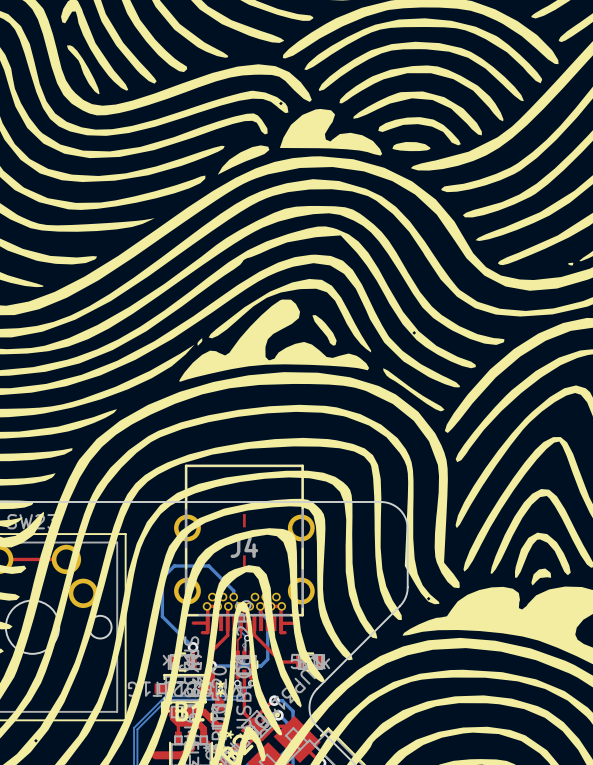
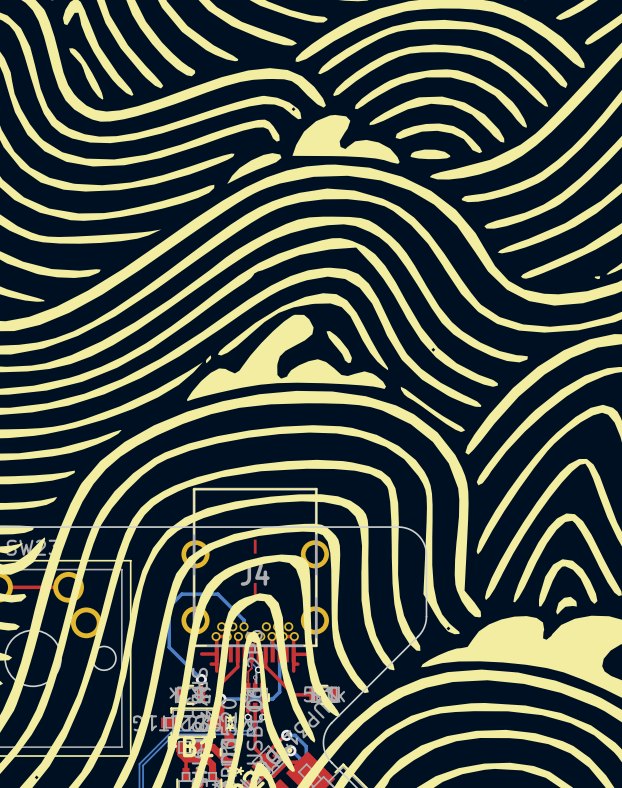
top track: none -> (216, 664) (216, 671)
top track: none -> (293, 664) (293, 671)

